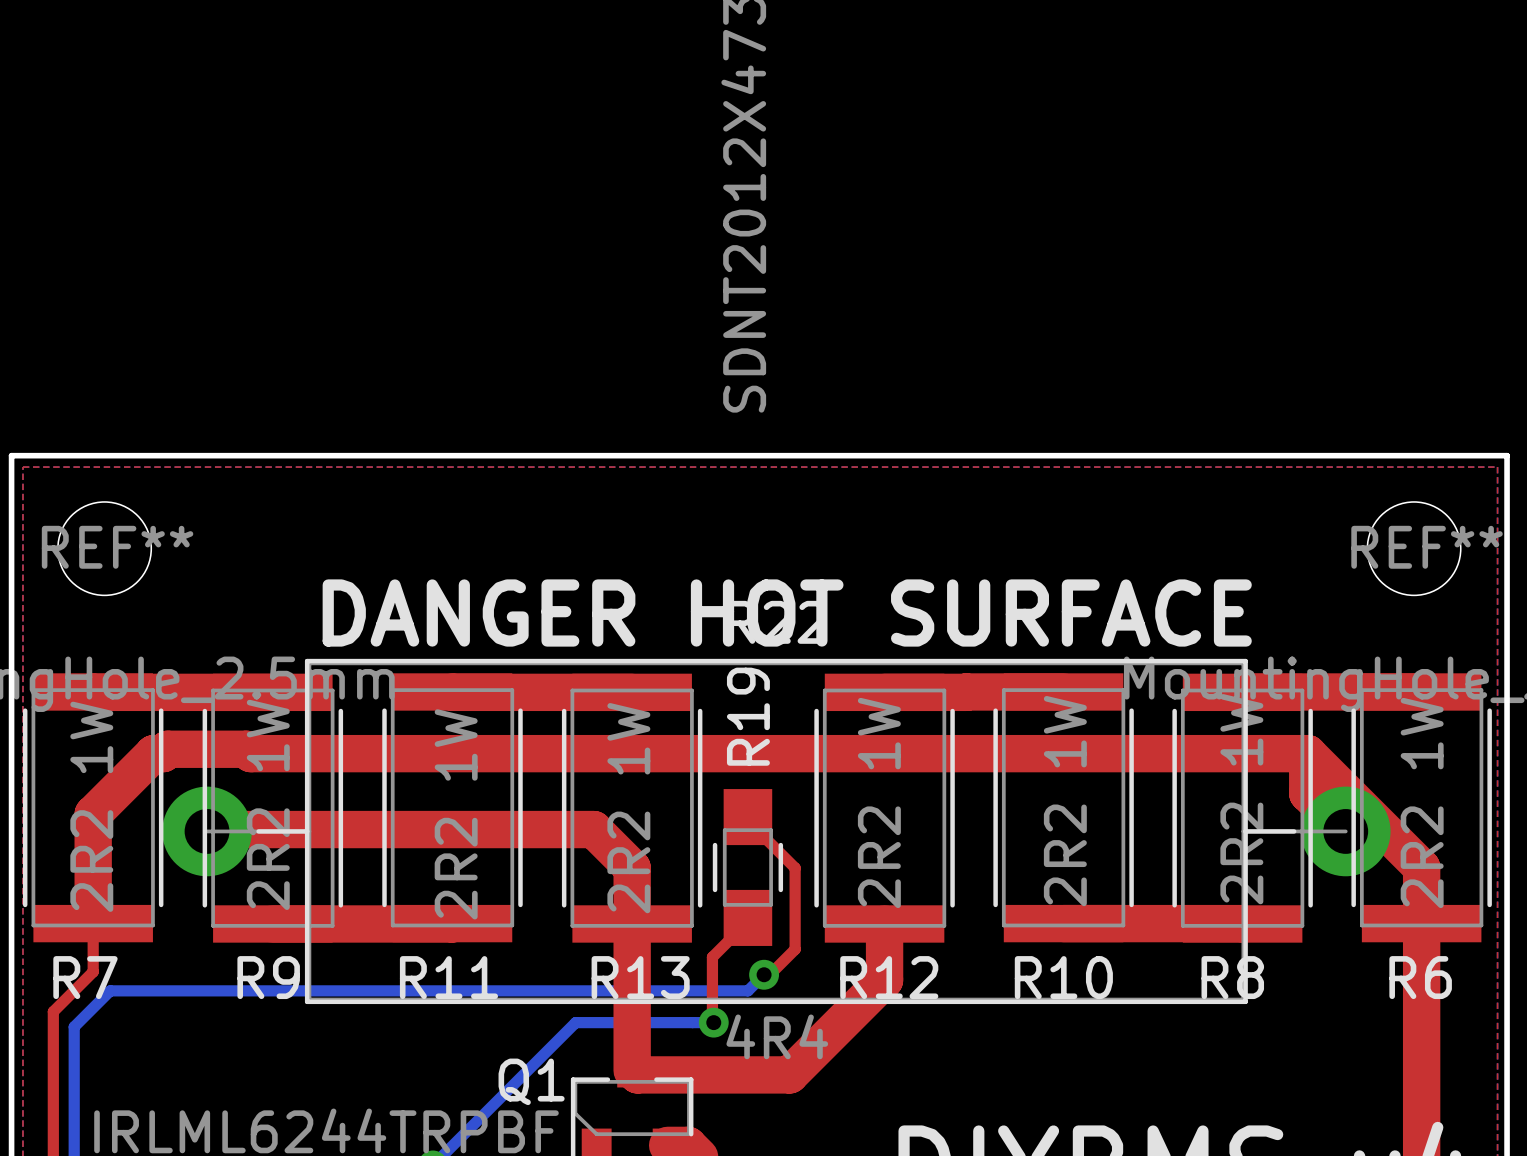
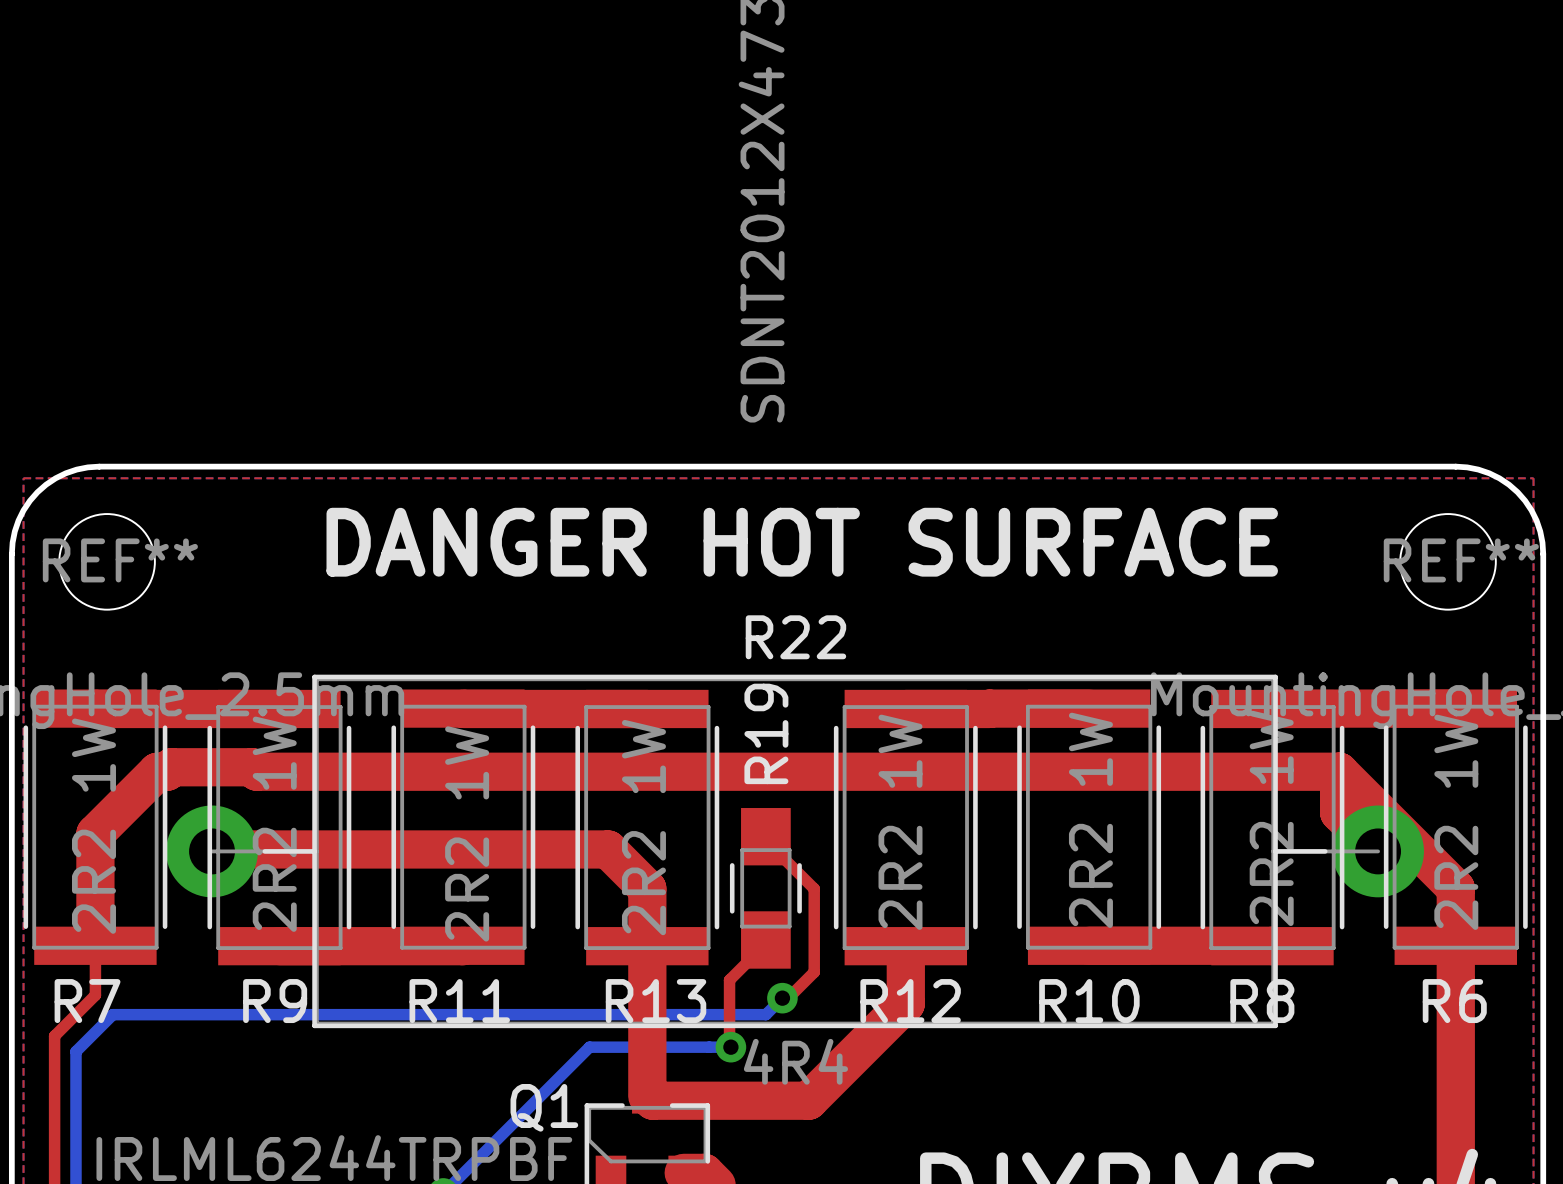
board edge: (96, 455) (11, 455) (11, 541) -> (99, 466) (65, 473) (37, 492) (18, 520) (11, 554)
board edge: (1421, 455) (1507, 455) (1507, 541) -> (1455, 466) (1489, 473) (1517, 492) (1536, 520) (1543, 554)
text position: DANGER HOT SURFACE (787, 613) -> DANGER HOT SURFACE (802, 542)

